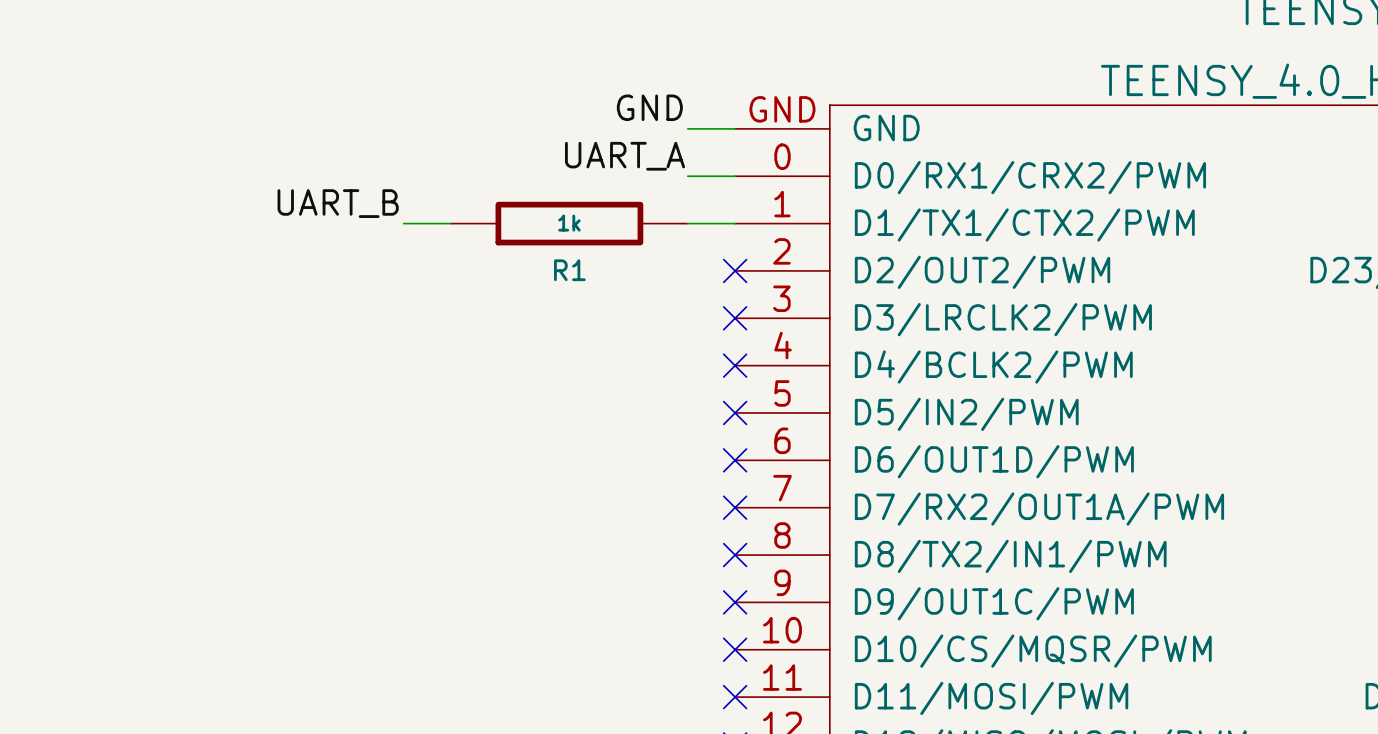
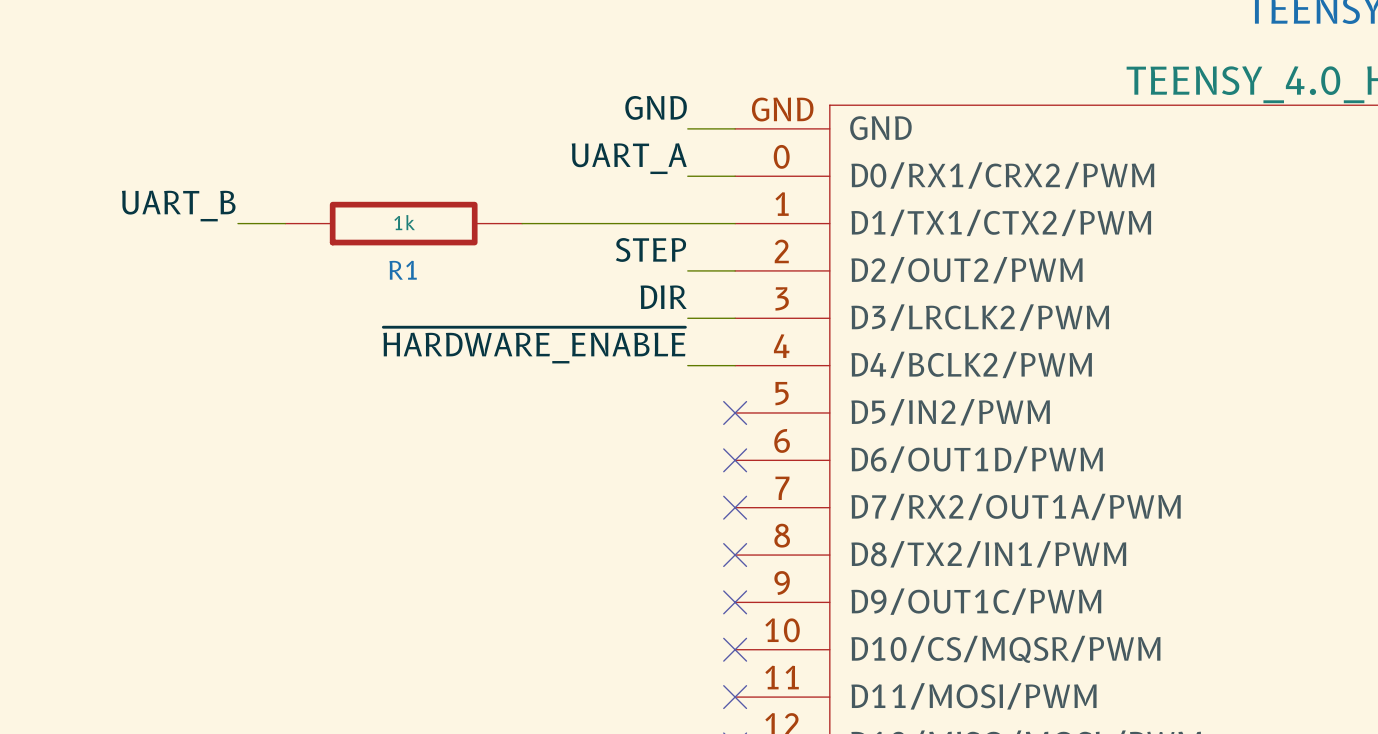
label position: UART_B (338, 203) -> UART_B (178, 206)
wire: (403, 223) (451, 223) -> (237, 223) (285, 223)
wire: none -> (522, 223) (687, 223)
R1 position: (569, 223) -> (403, 223)
label: none -> STEP (650, 249)
wire: none -> (687, 270) (735, 270)
no-connect mark: (735, 270) -> none
label: none -> DIR (663, 297)
wire: none -> (687, 318) (735, 318)
no-connect mark: (735, 318) -> none
label: none -> ~{HARDWARE_ENABLE} (534, 345)
wire: none -> (687, 365) (735, 365)
no-connect mark: (735, 365) -> none

